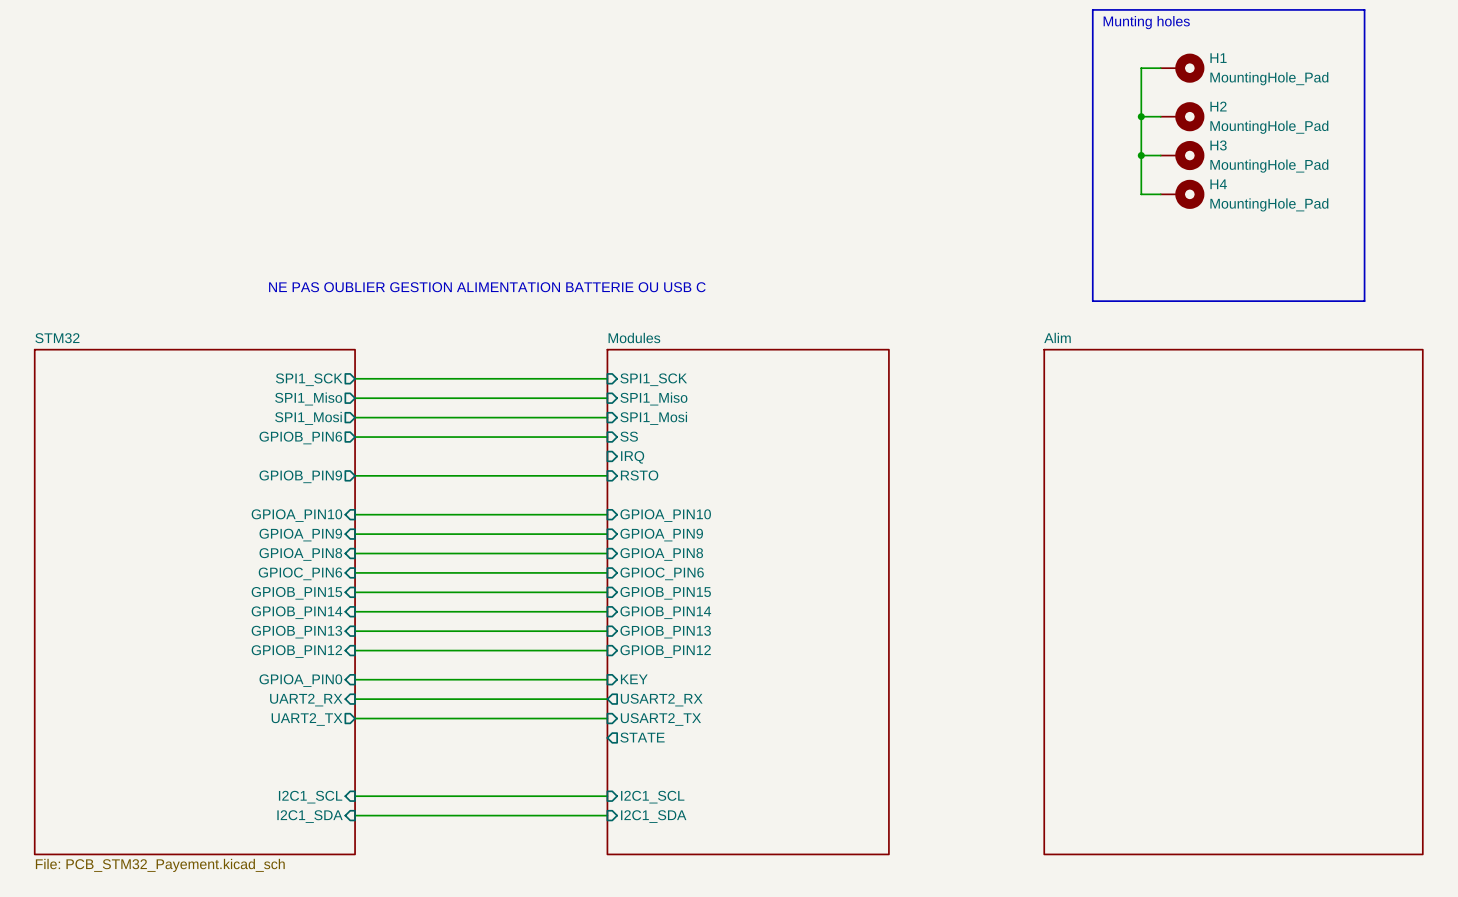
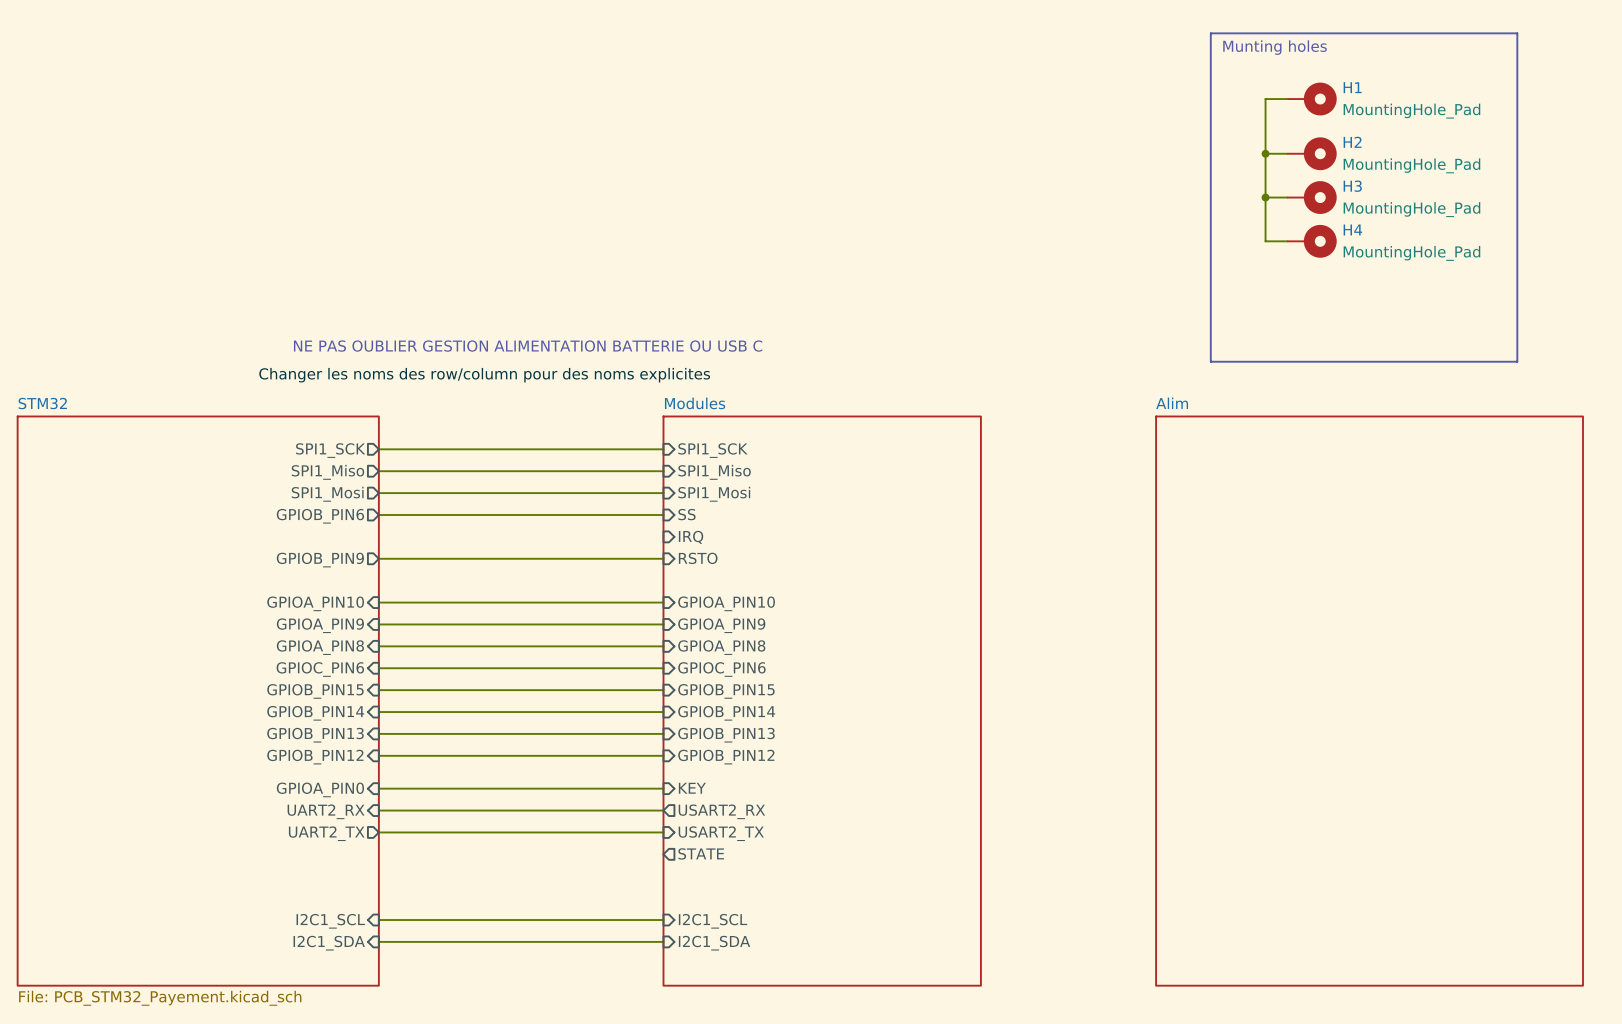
label: none -> Changer les noms des row/column pour des noms explicites (484, 375)

